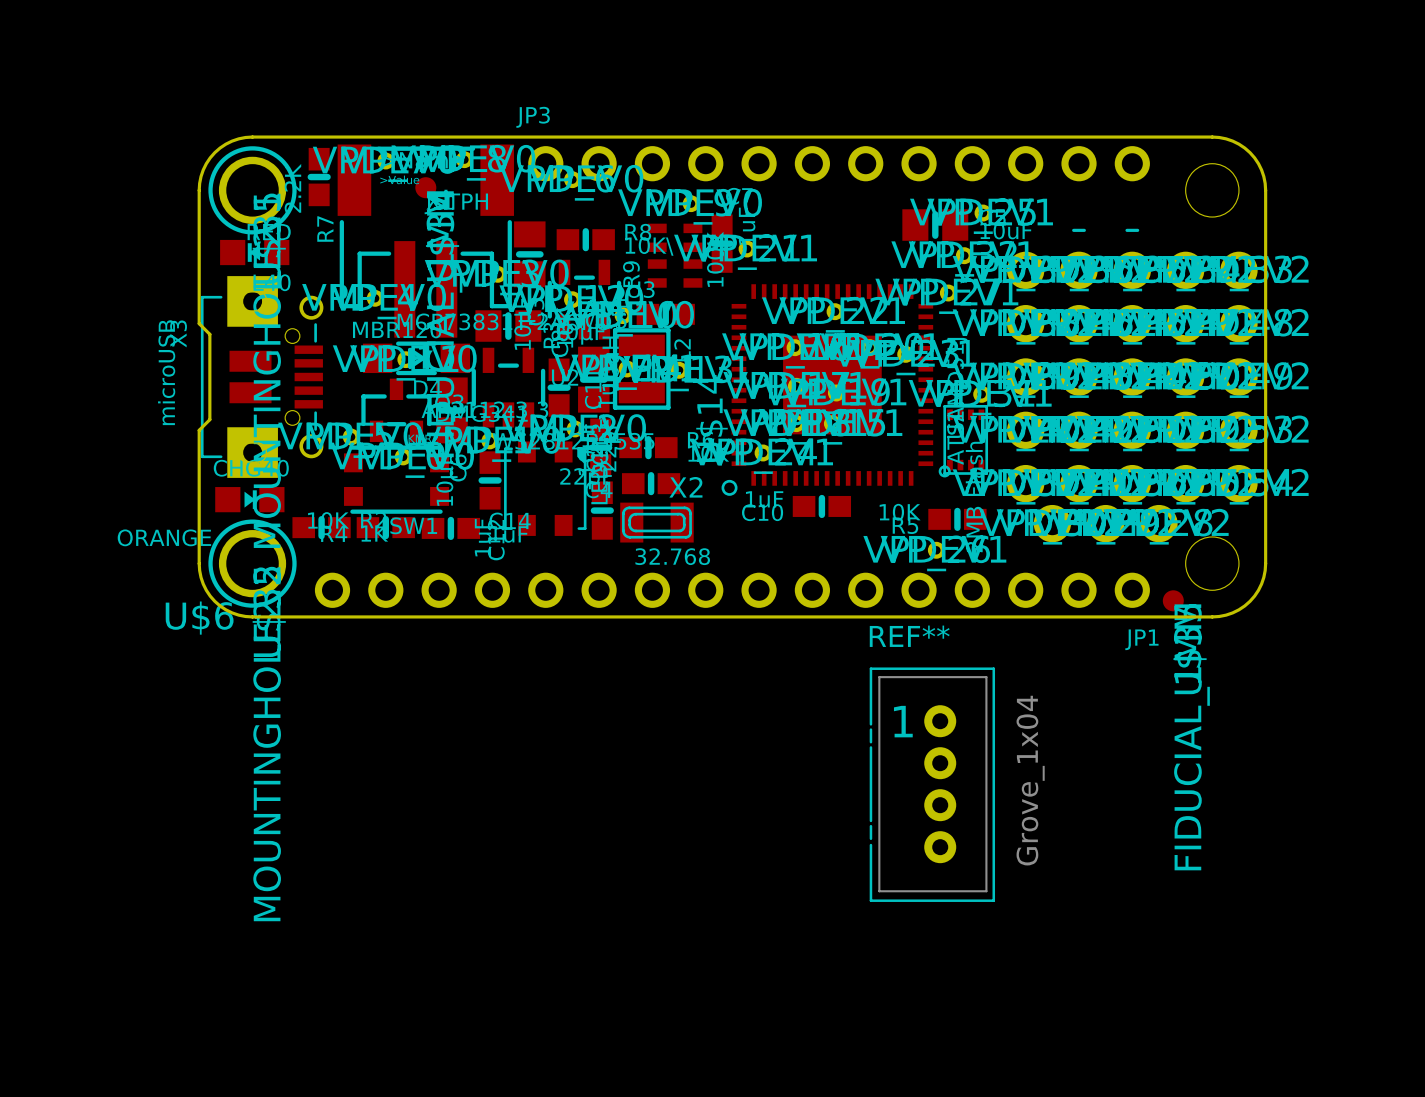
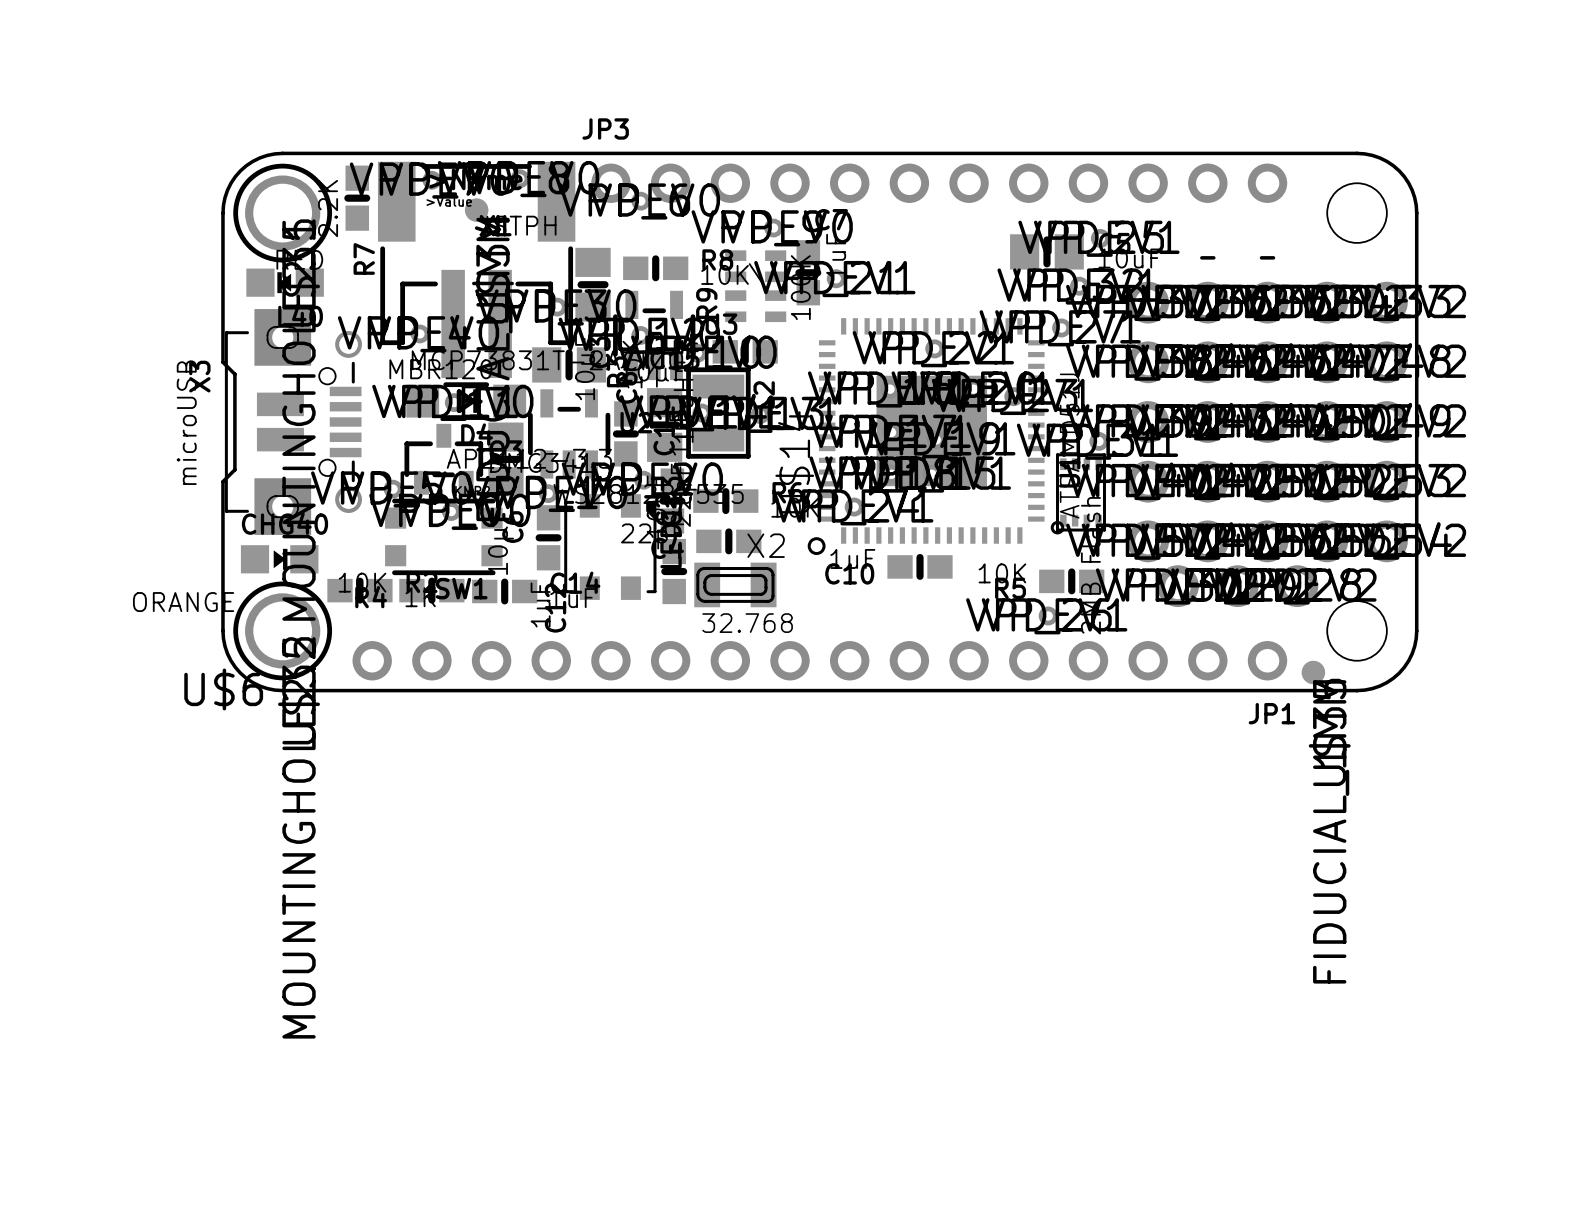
REF**: Grove_1x04 (932, 784) -> none

